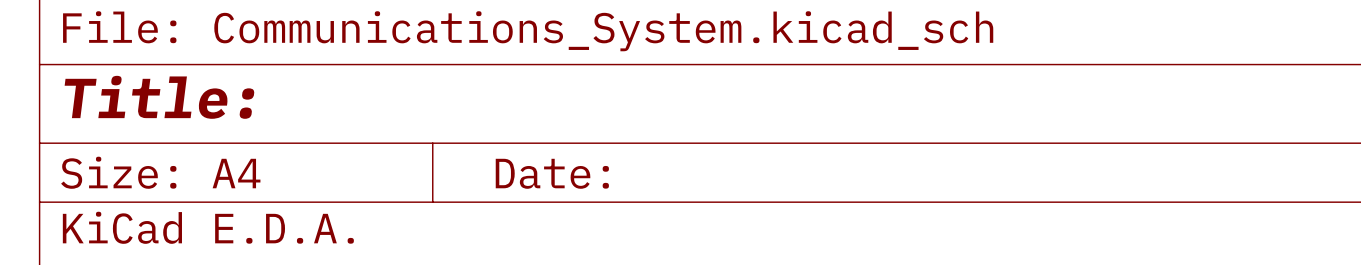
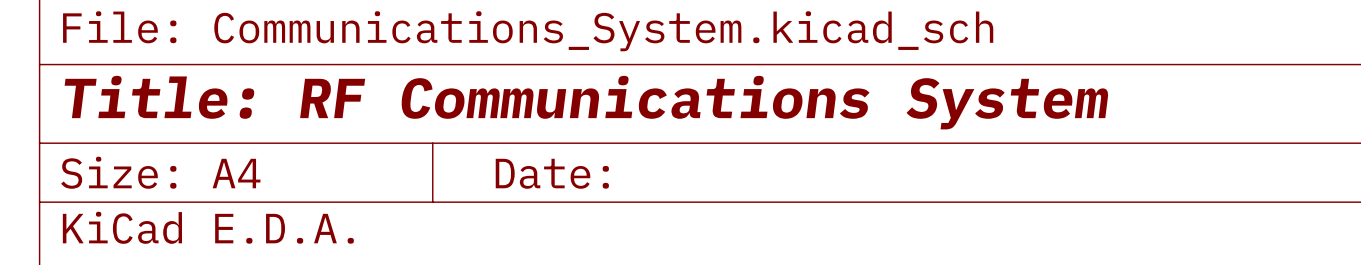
title block: Title: (159, 97) -> Title: RF Communications System (586, 102)

